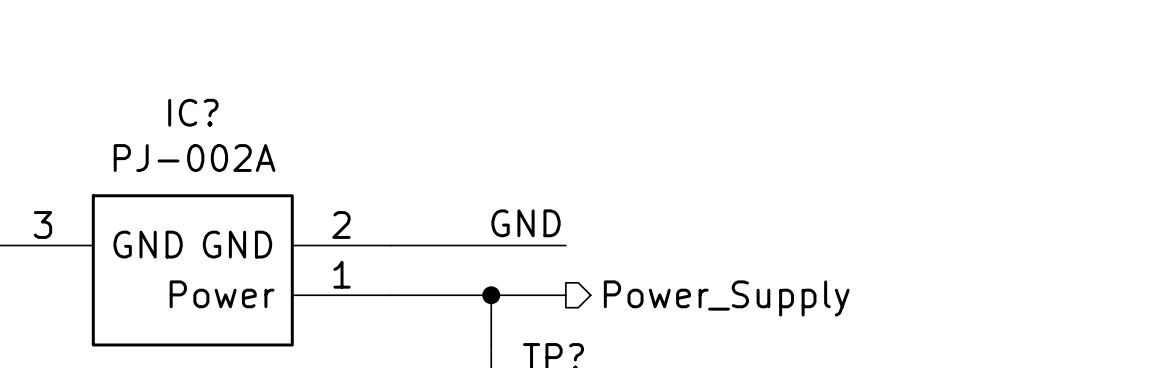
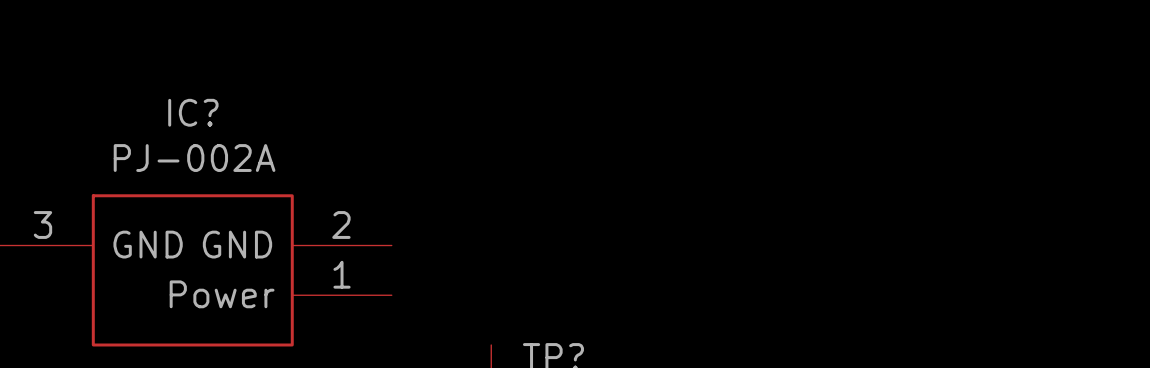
label: GND (526, 223) -> none
wire: (391, 245) (565, 245) -> none
wire: (391, 295) (565, 295) -> none
wire: (491, 295) (491, 345) -> none
junction: (491, 295) -> none
hierarchical label: Power_Supply (726, 298) -> none

